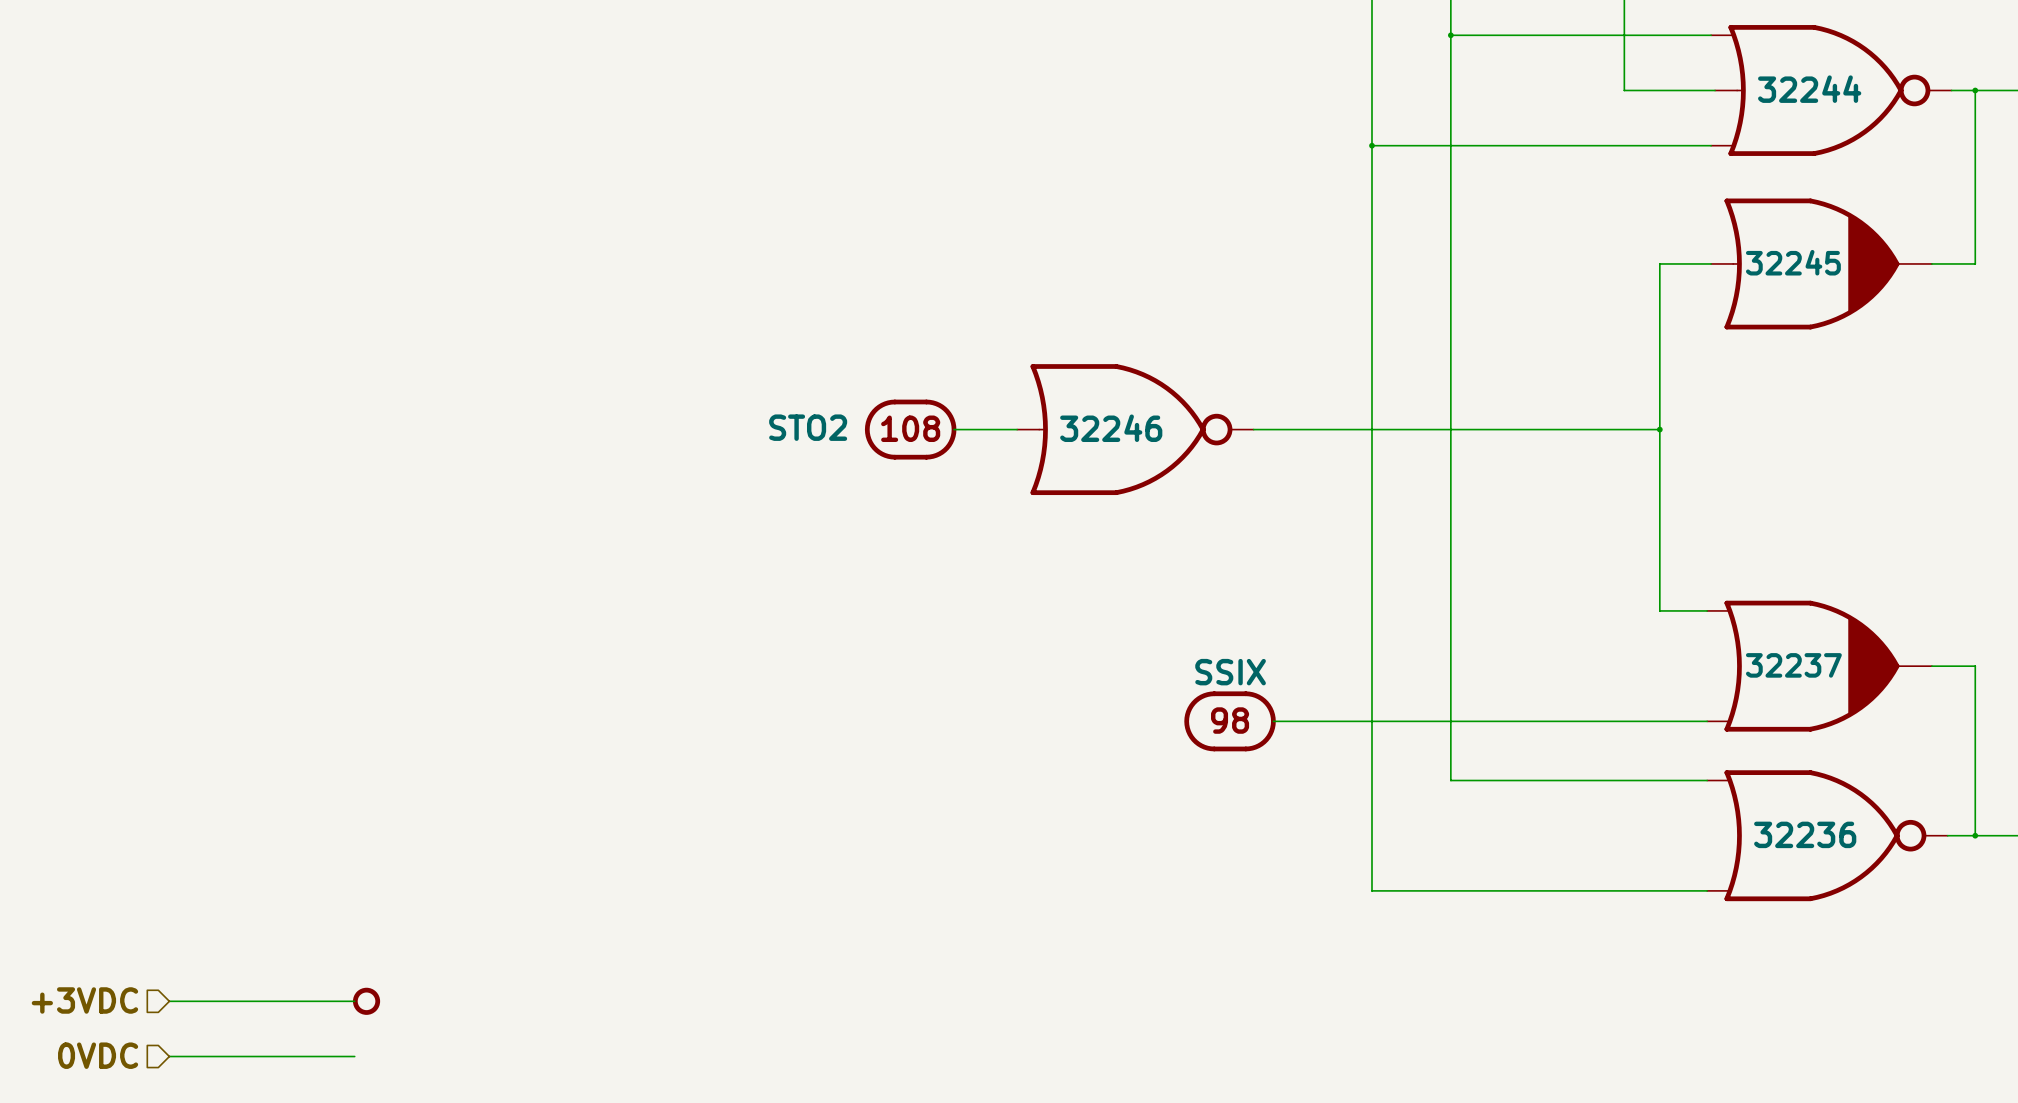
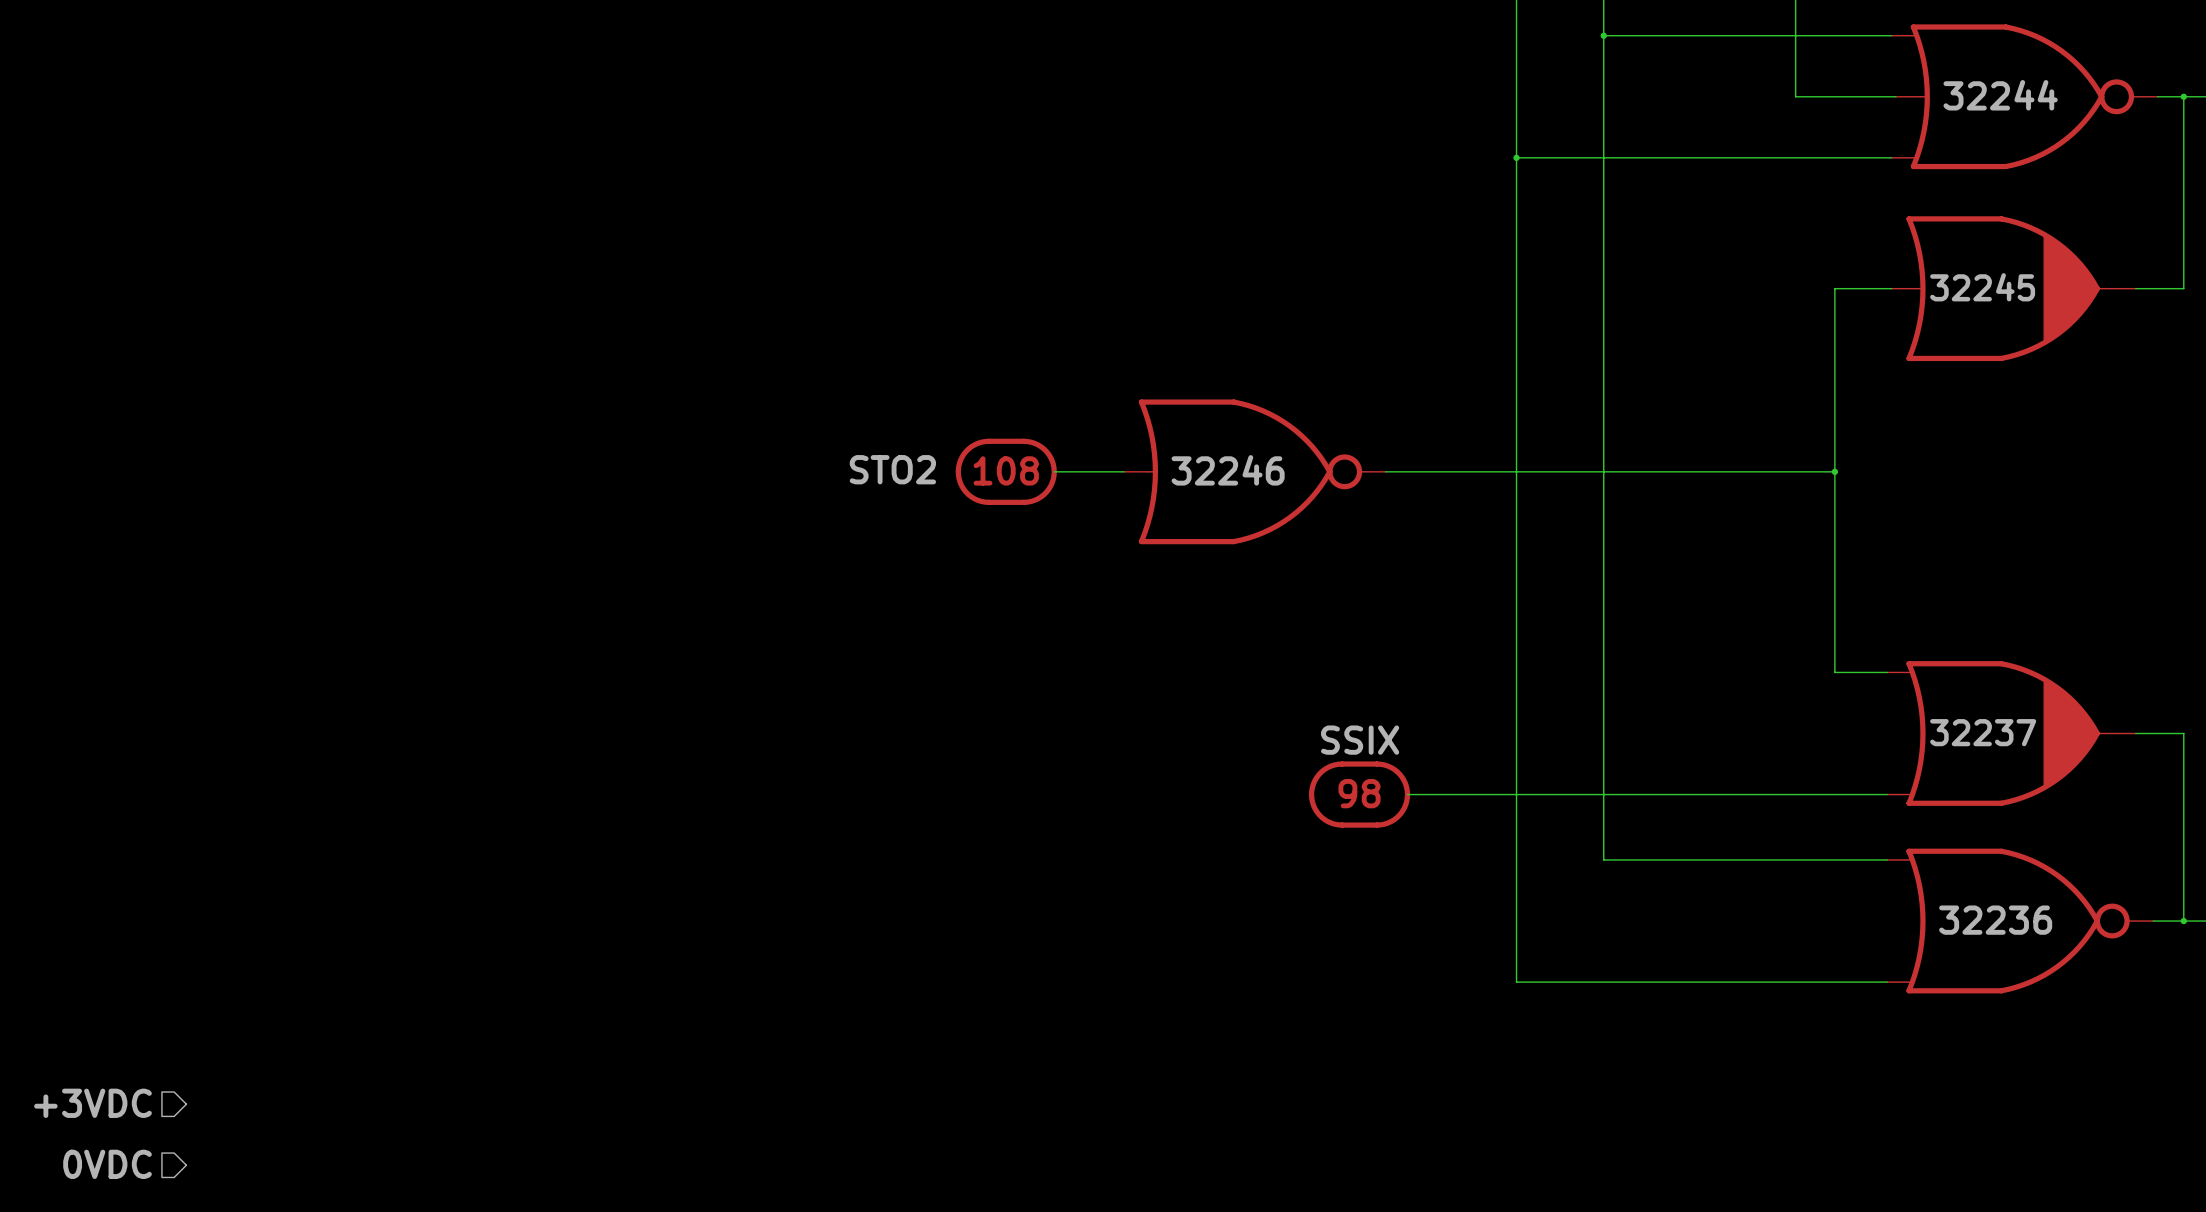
wire: (169, 1001) (354, 1001) -> none
part: (366, 1001) -> none
wire: (169, 1056) (354, 1056) -> none

